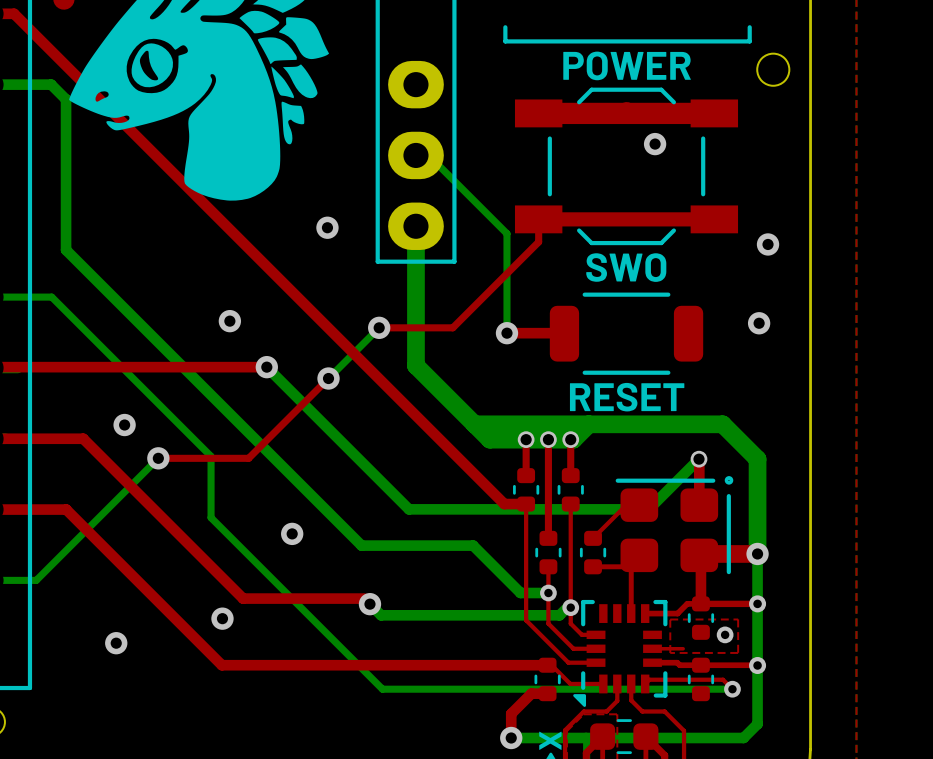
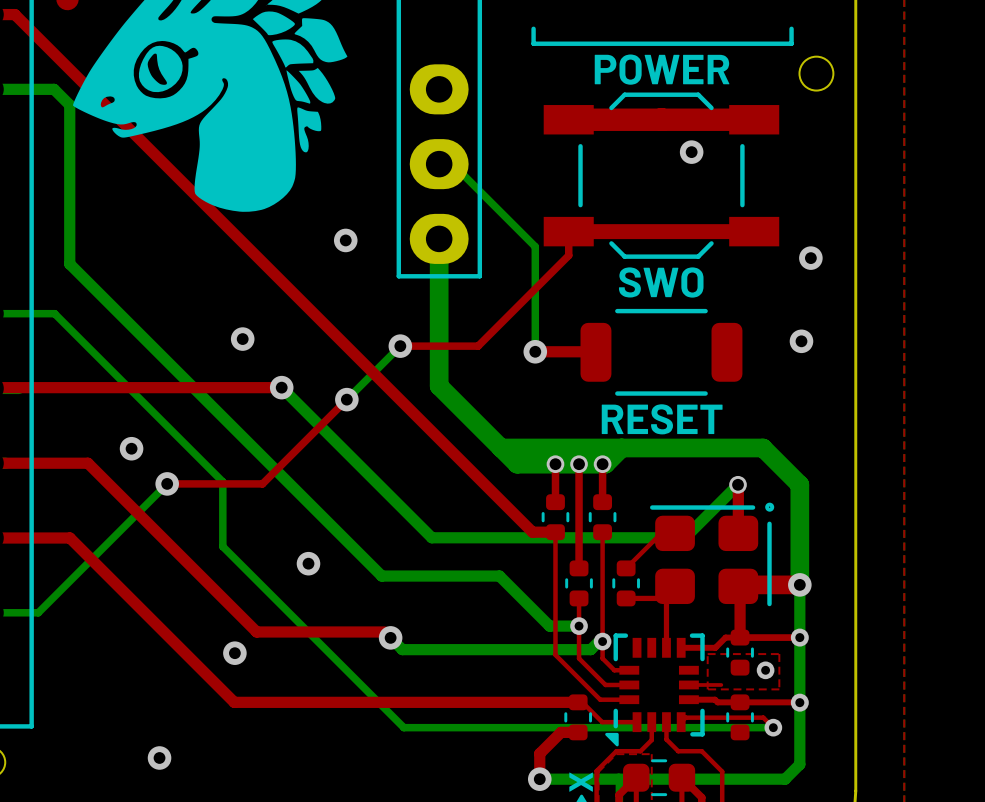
via position: (116, 643) -> (159, 757)

